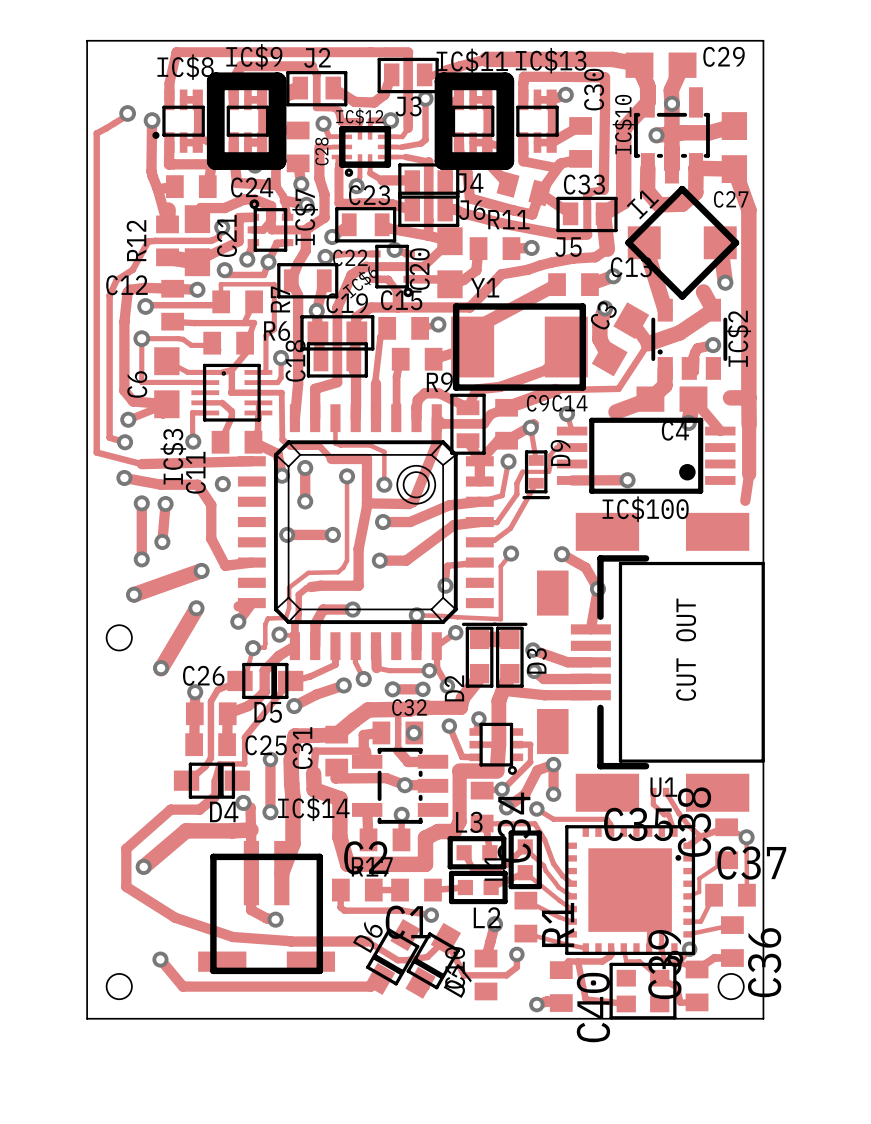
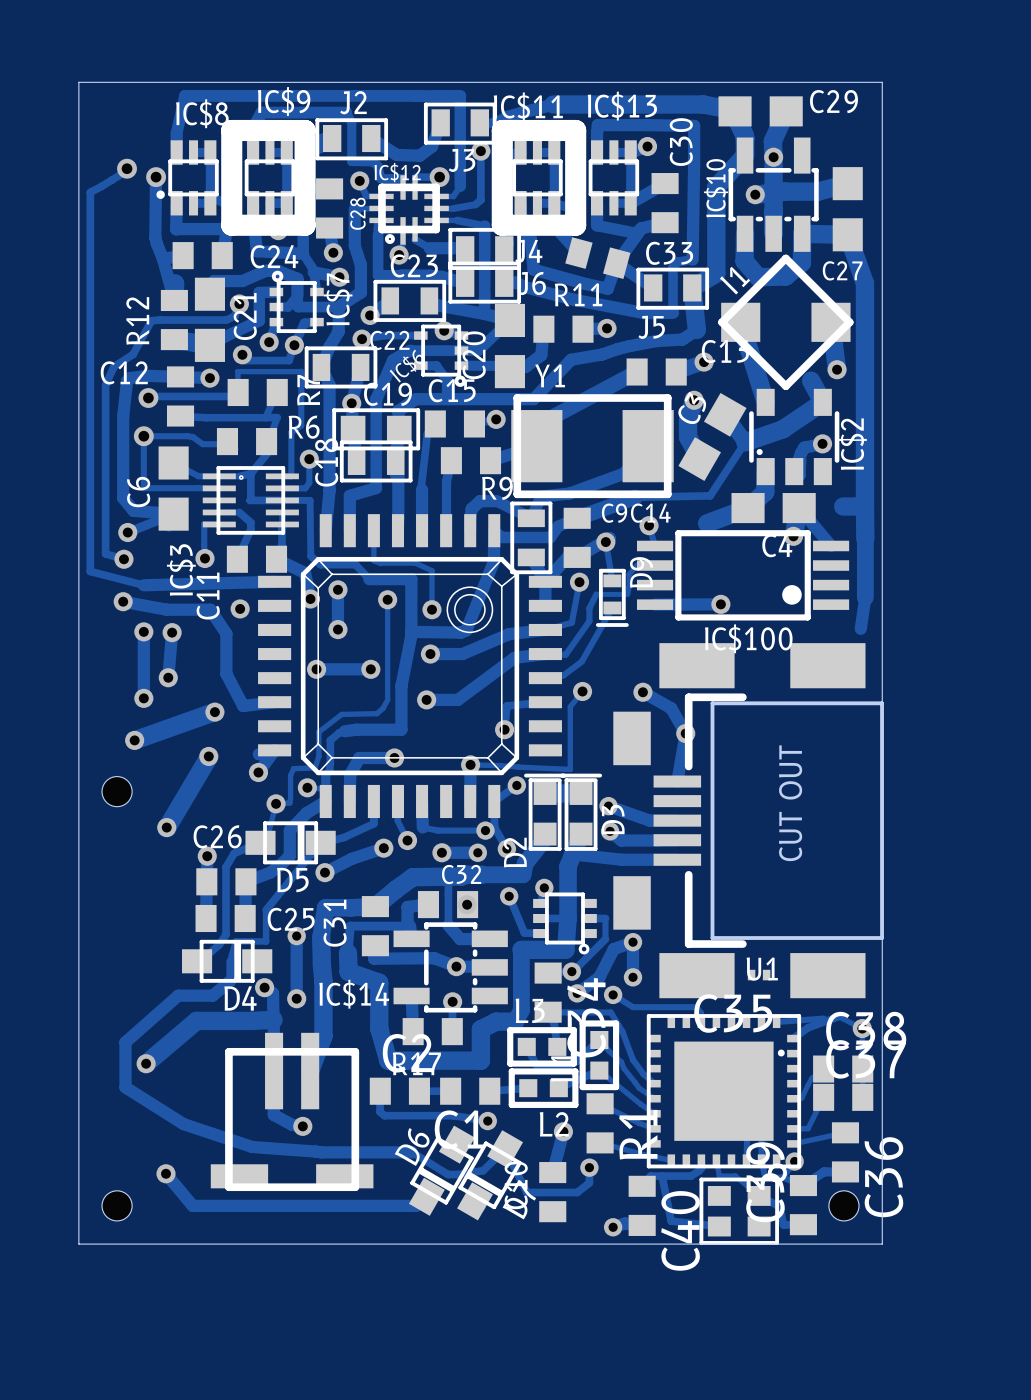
track: (653, 792) (653, 804) (664, 814) (668, 814) (674, 831) -> (823, 1018) (776, 1022)
track: (666, 792) (679, 813) (700, 836) -> none
C38 rotation: 0° (726, 843) -> 90° clockwise (843, 1069)
track: (726, 860) (699, 878) (699, 892) (688, 896) -> (823, 1069) (811, 1078) (801, 1098) (793, 1098)

